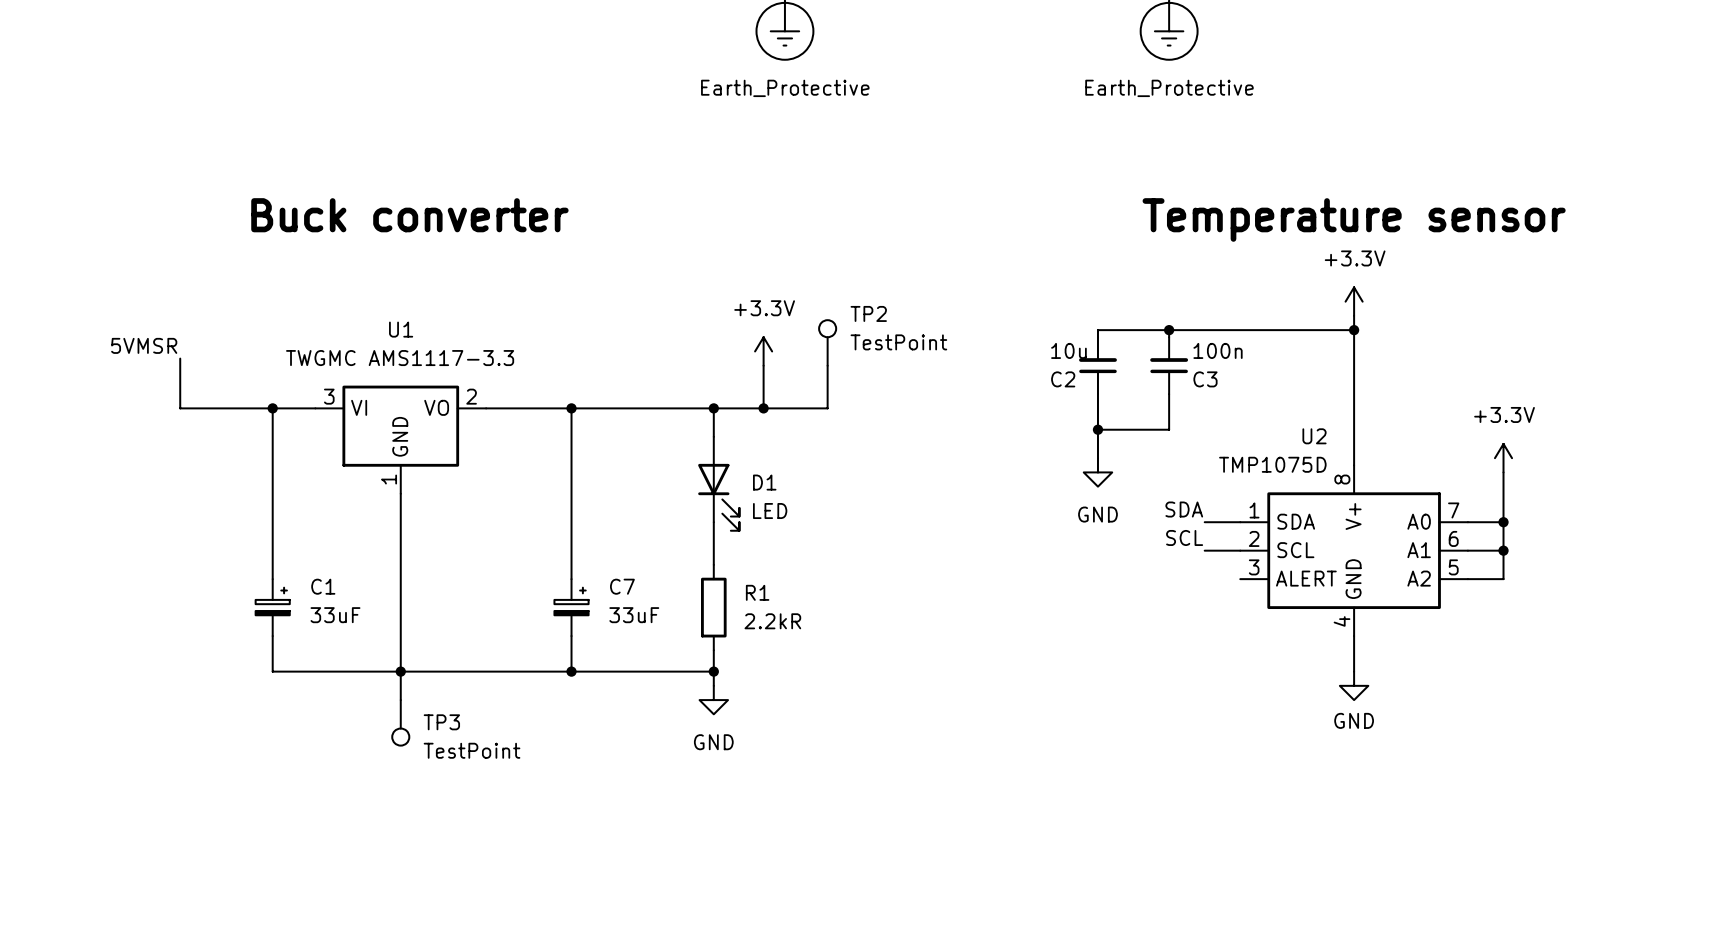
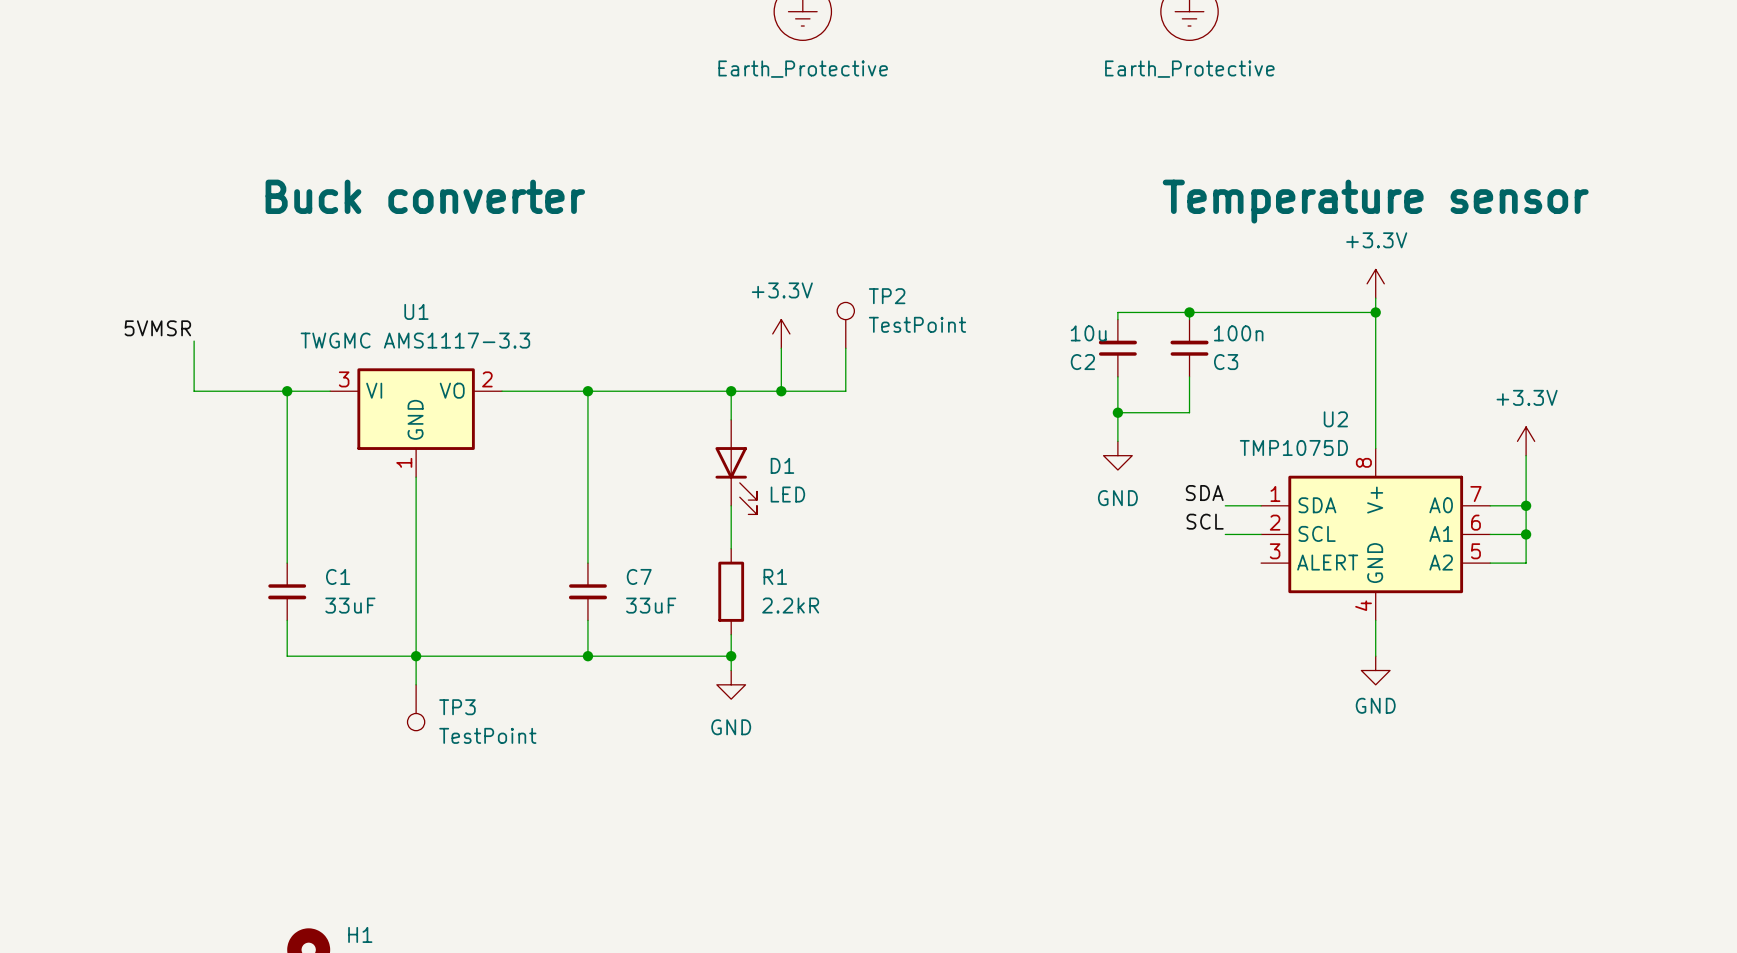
C1 symbol: [255, 579, 290, 637] -> [268, 563, 307, 621]
C7 symbol: [554, 579, 589, 637] -> [568, 563, 608, 621]

